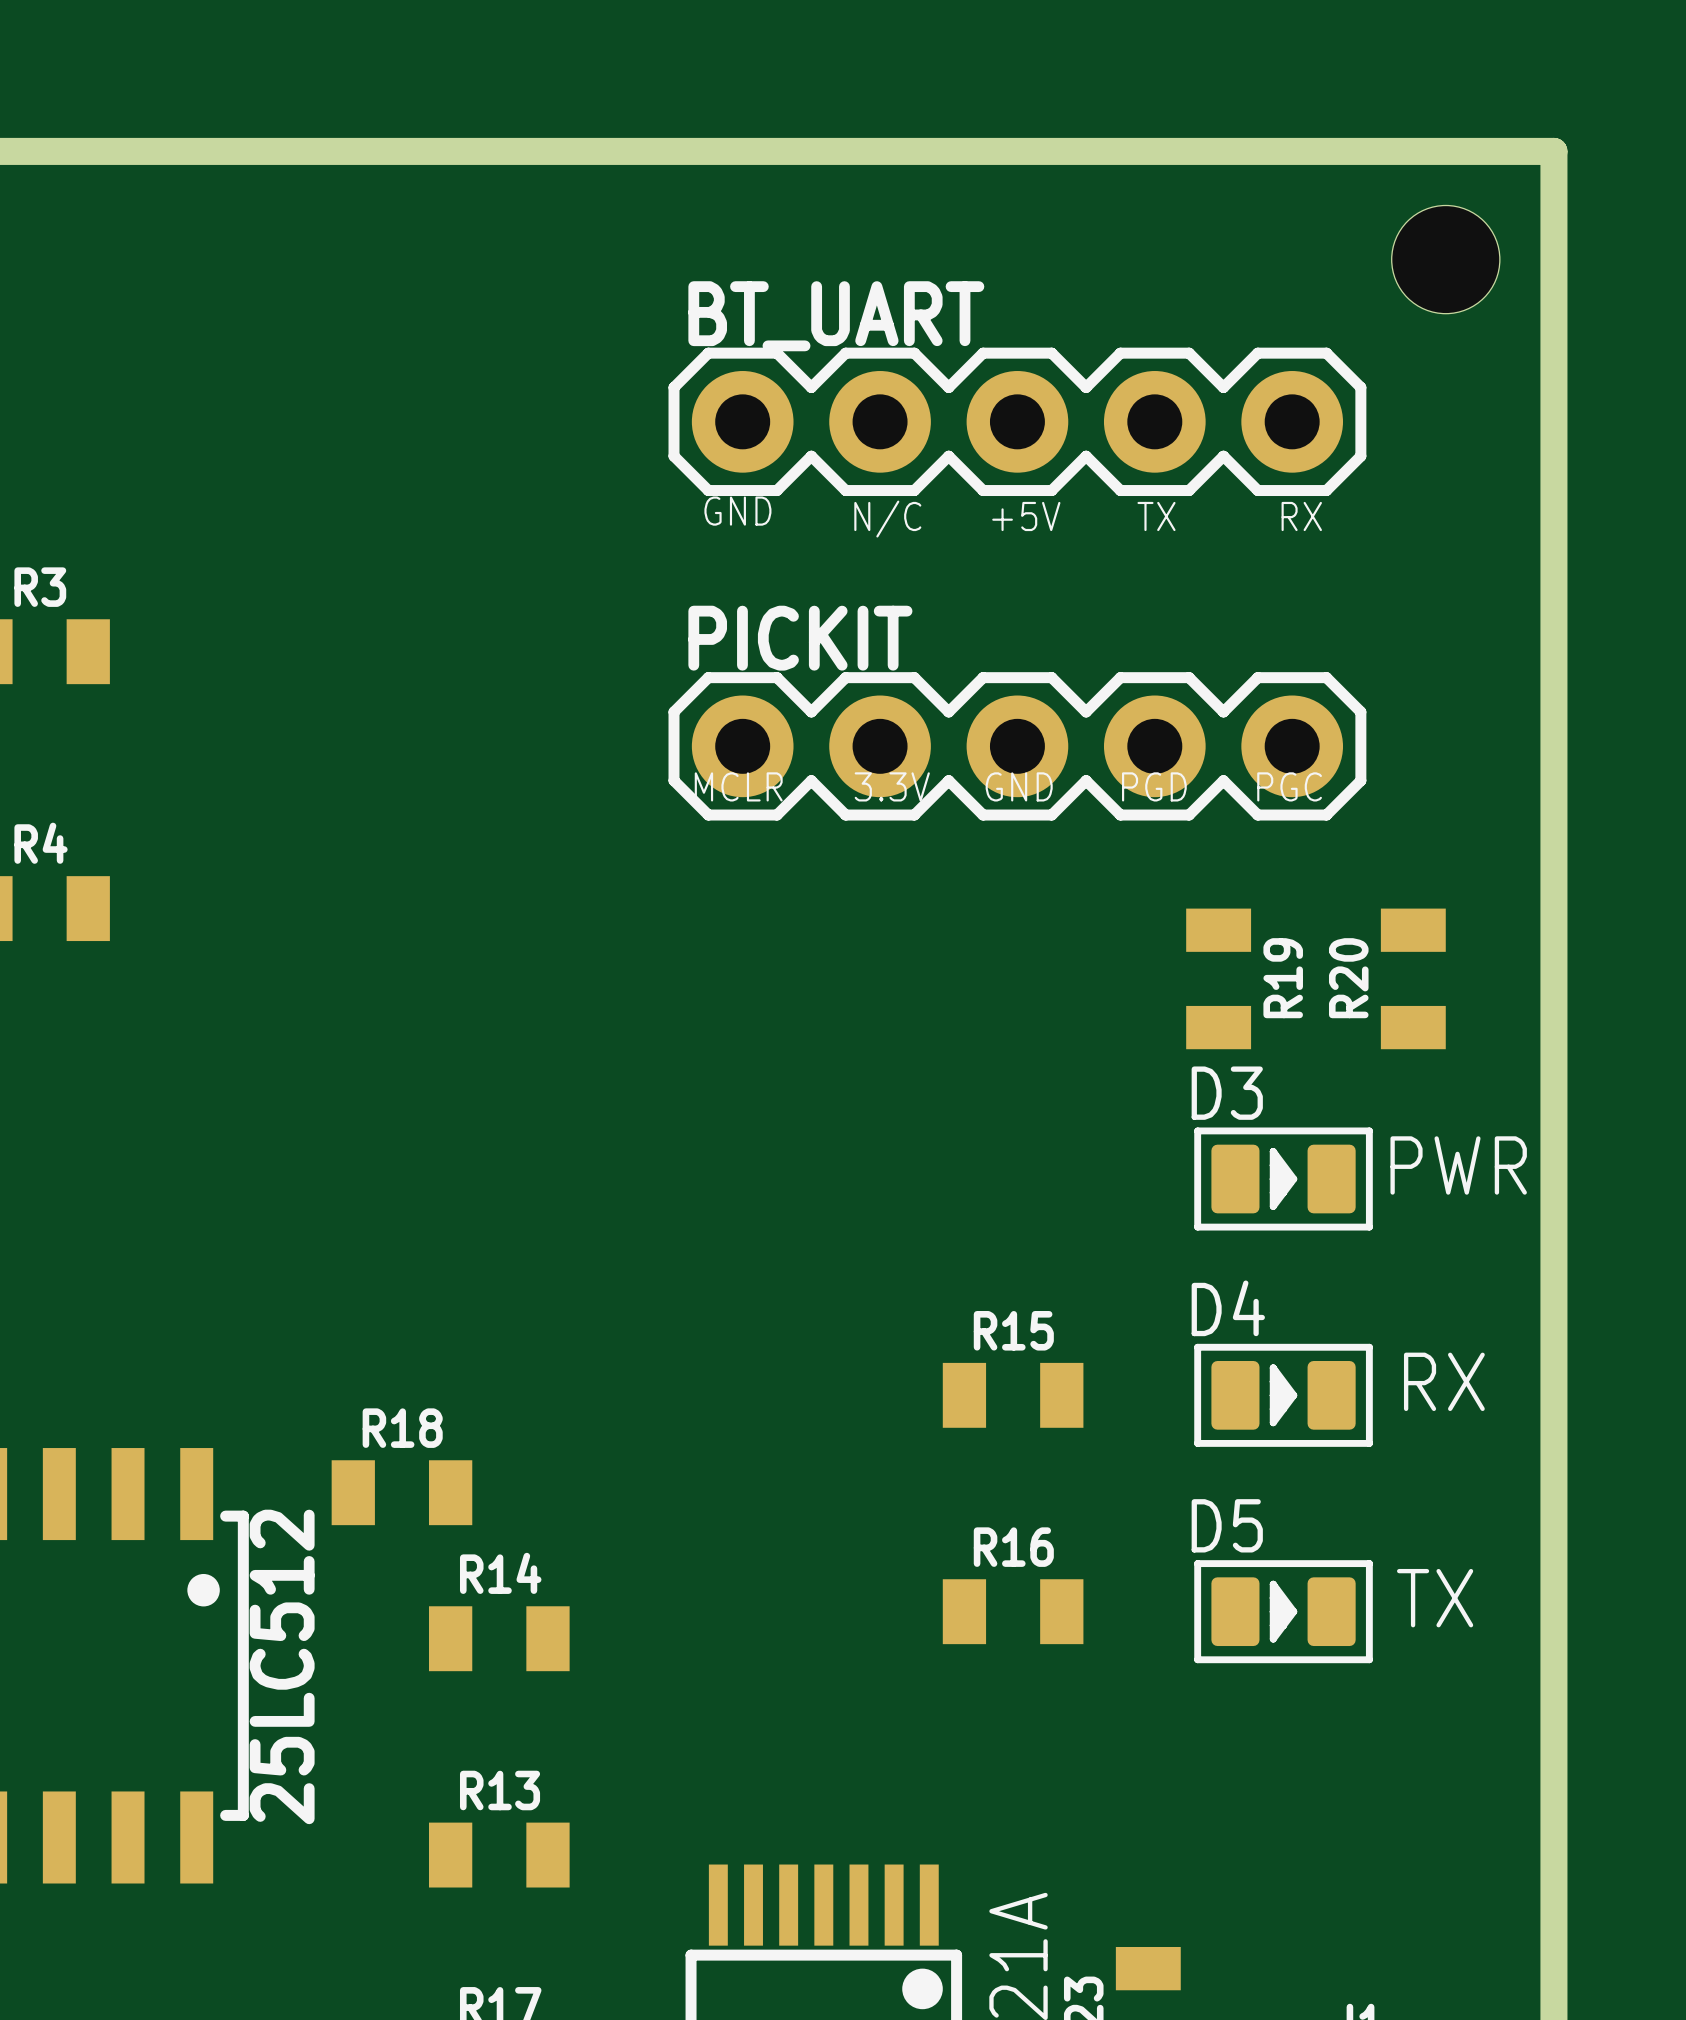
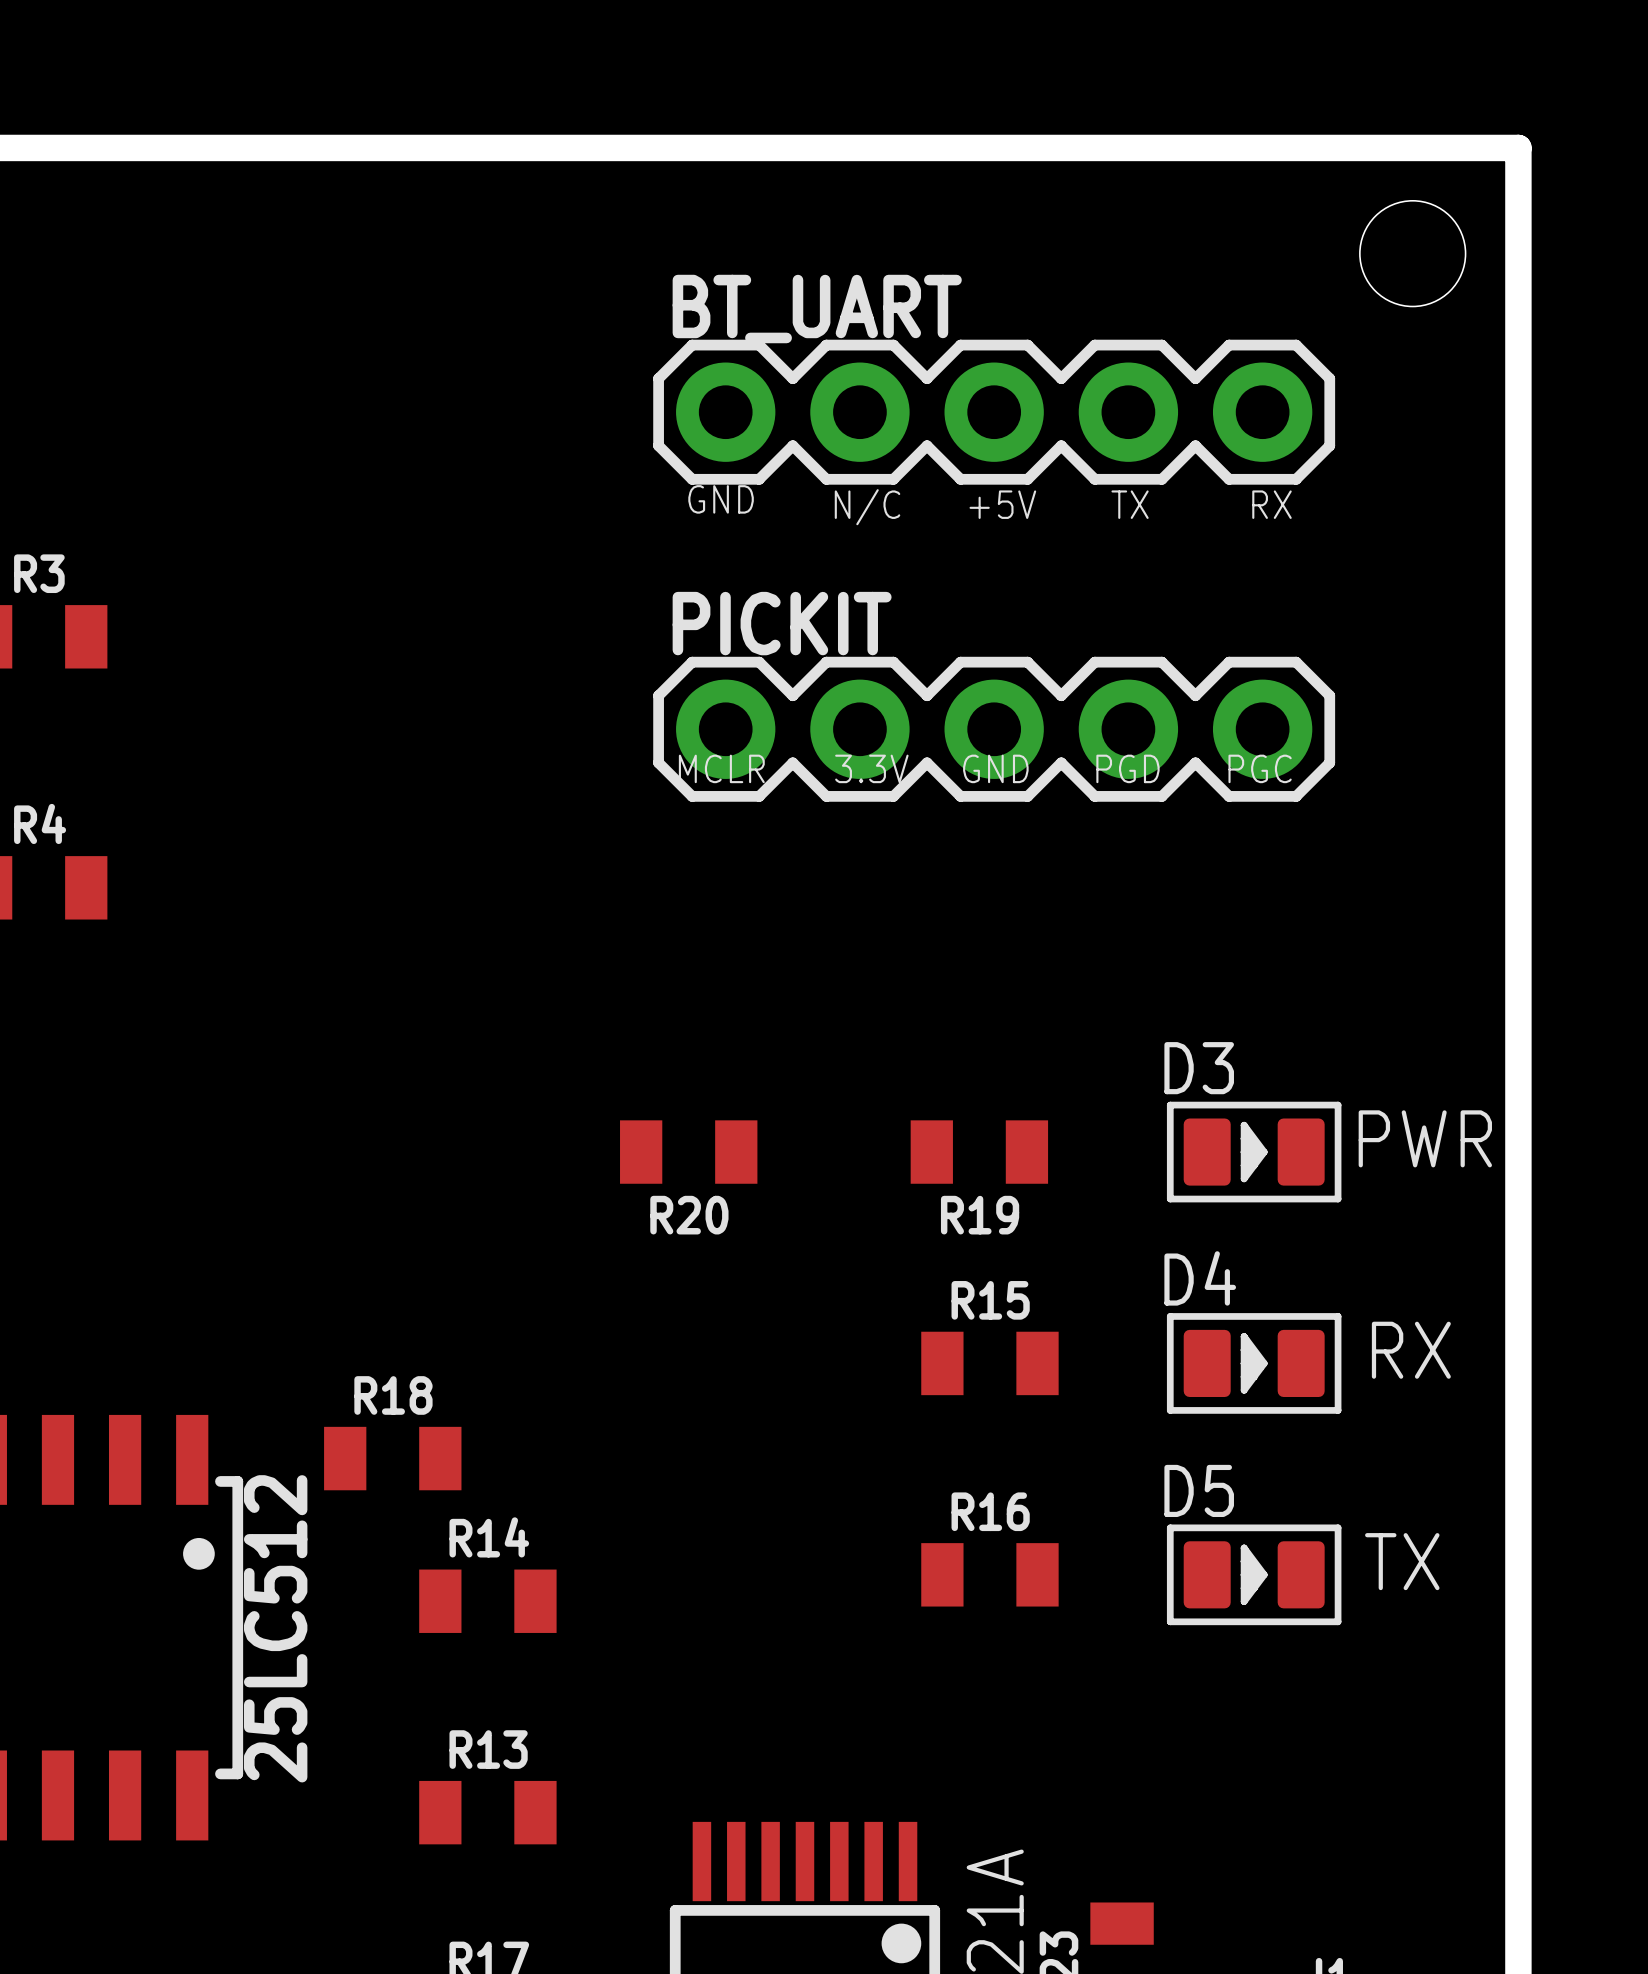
R19 rotation: 0° (1218, 978) -> 90° clockwise (979, 1152)
R19 position: (1218, 978) -> (979, 1152)
R20 rotation: 0° (1413, 978) -> 90° clockwise (688, 1152)
R20 position: (1413, 978) -> (688, 1152)

